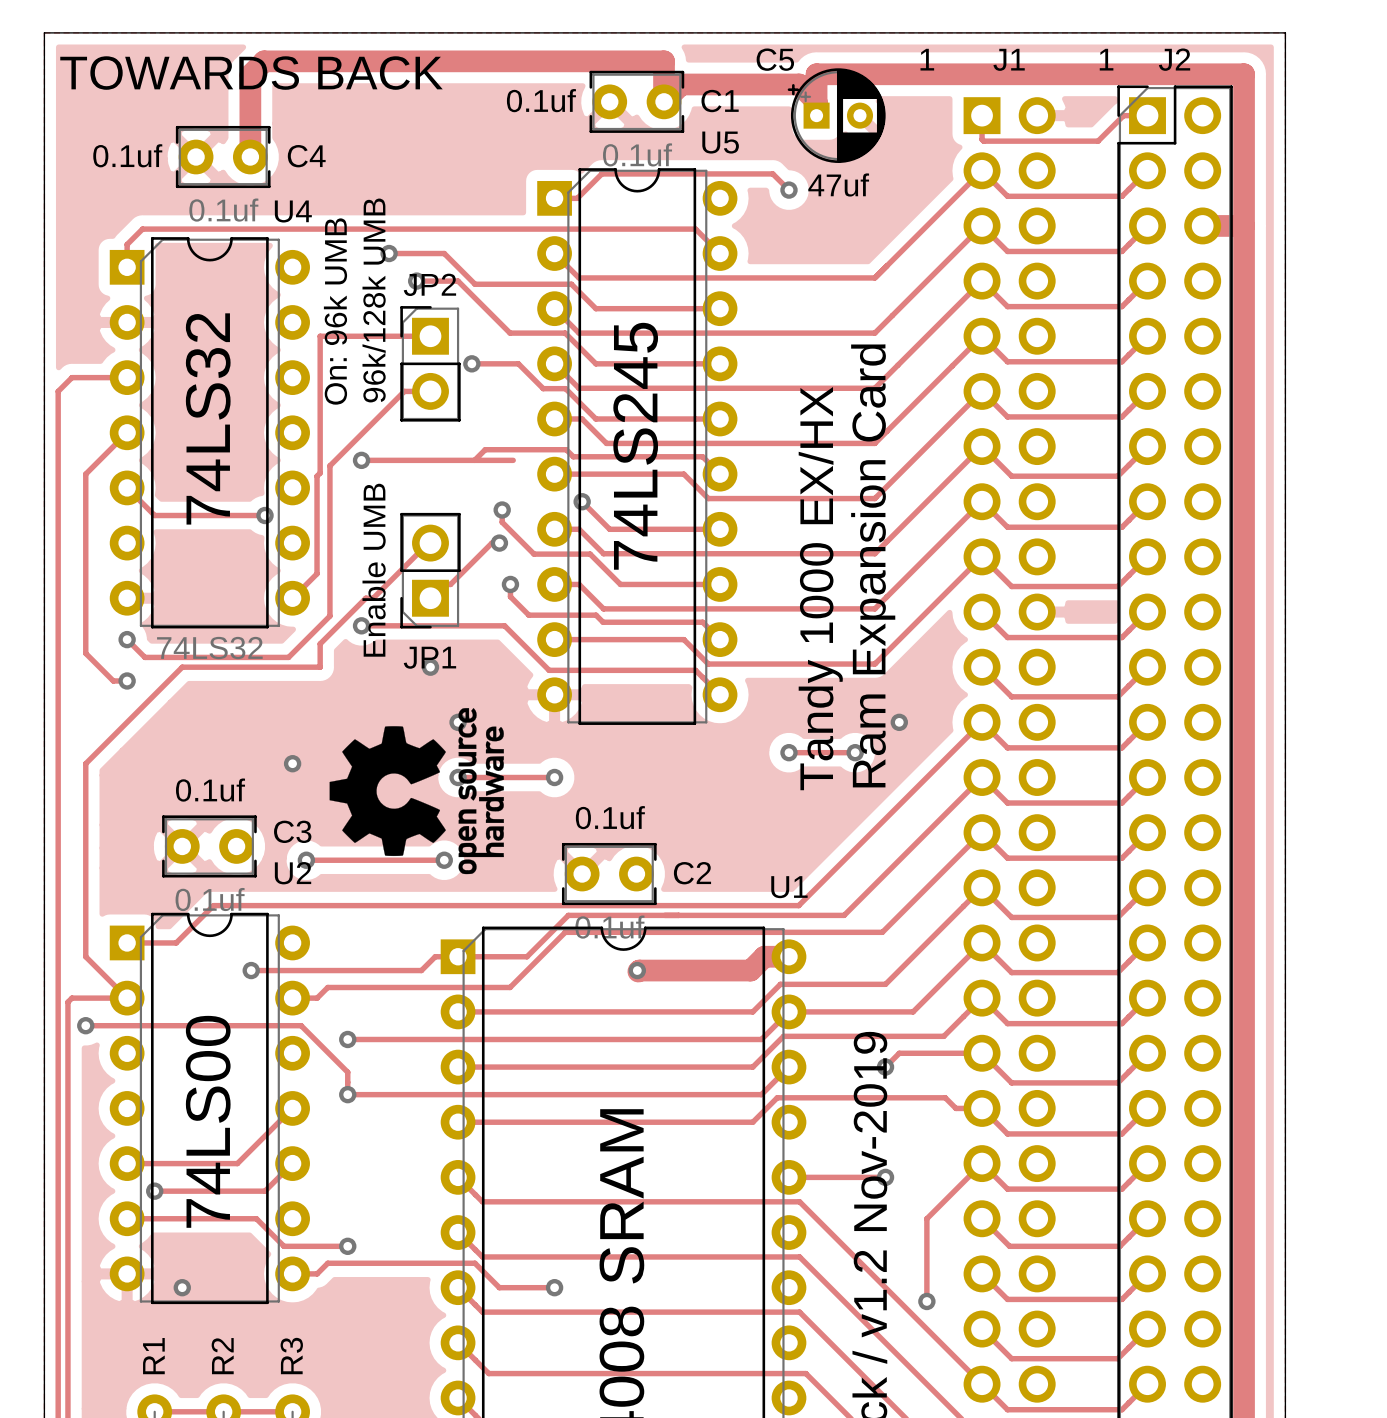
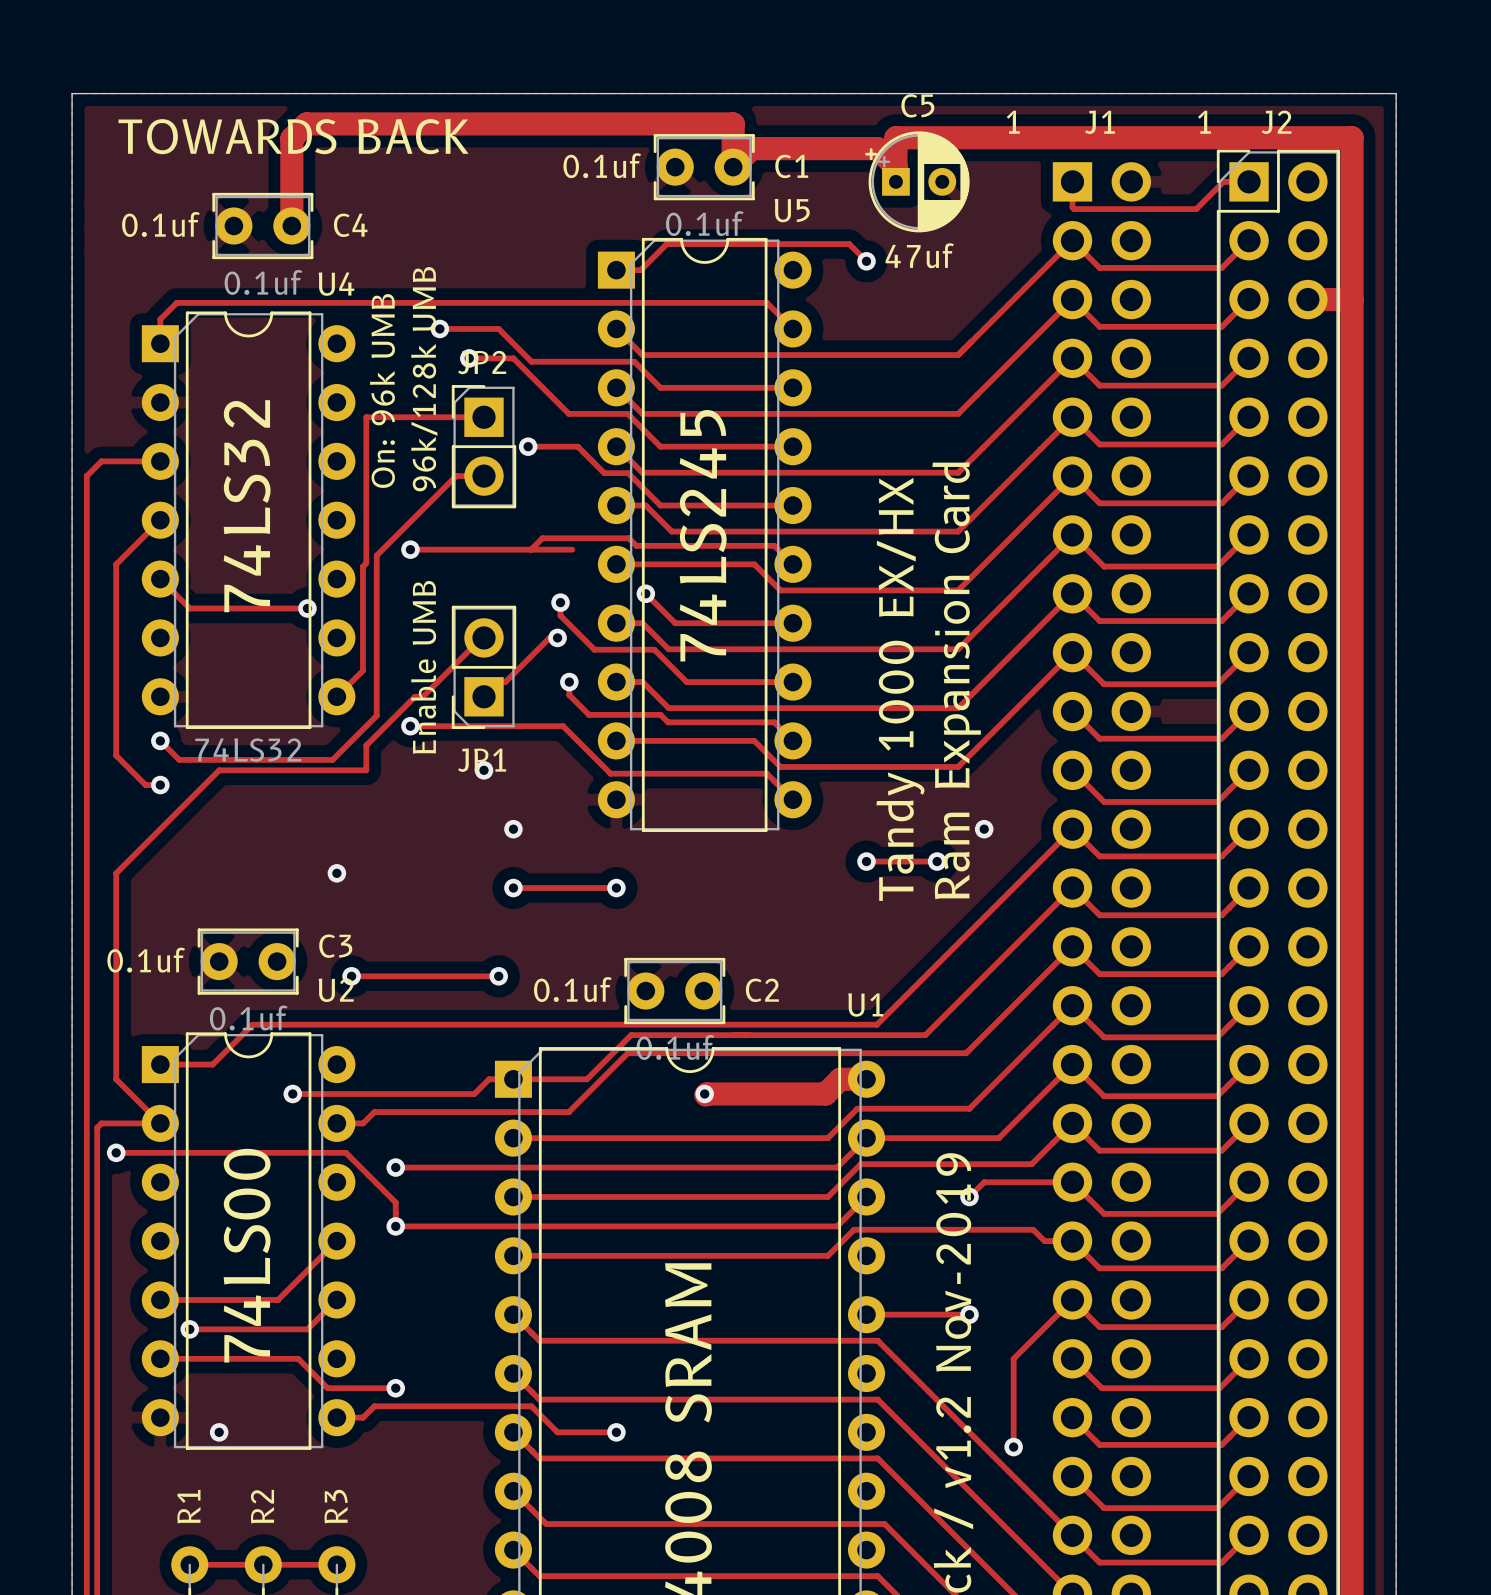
C5 name position: C5 (775, 59) -> C5 (917, 105)
drawing: [329, 708, 504, 875] -> none
text position: 0.1uf (210, 790) -> 0.1uf (146, 960)
text position: 0.1uf (610, 817) -> 0.1uf (572, 989)

